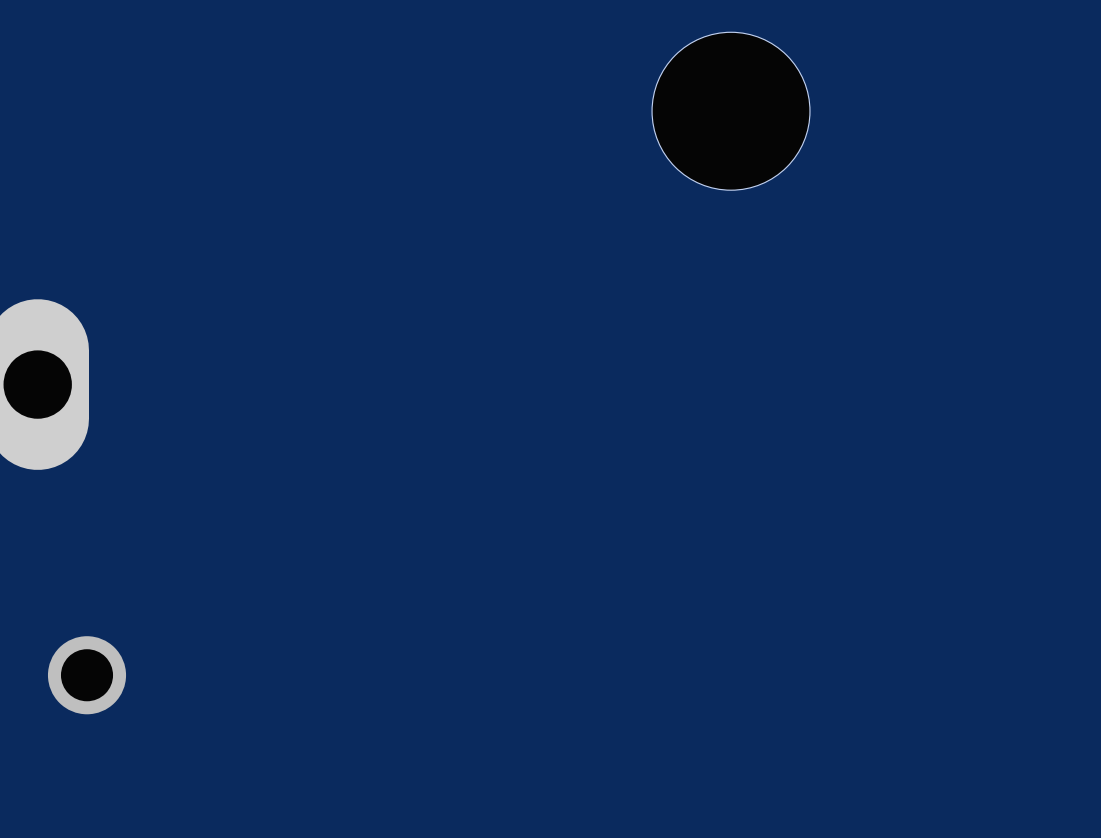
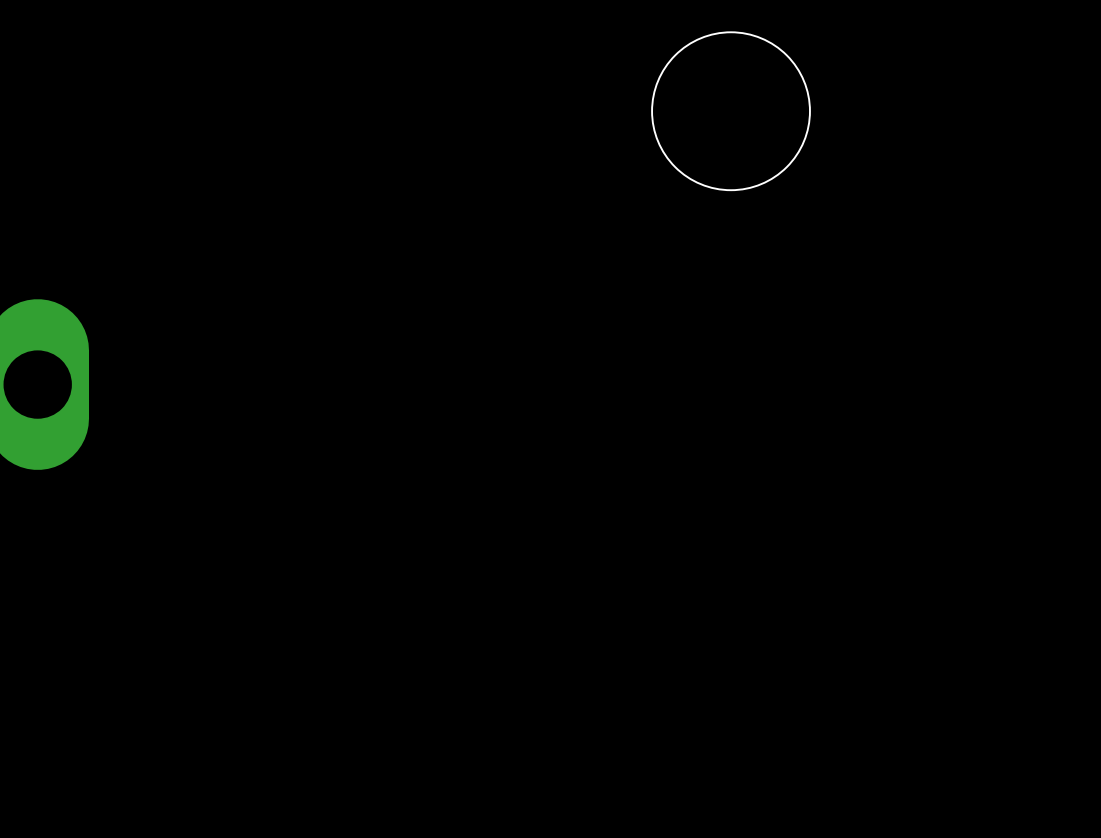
via: (87, 675) -> none

